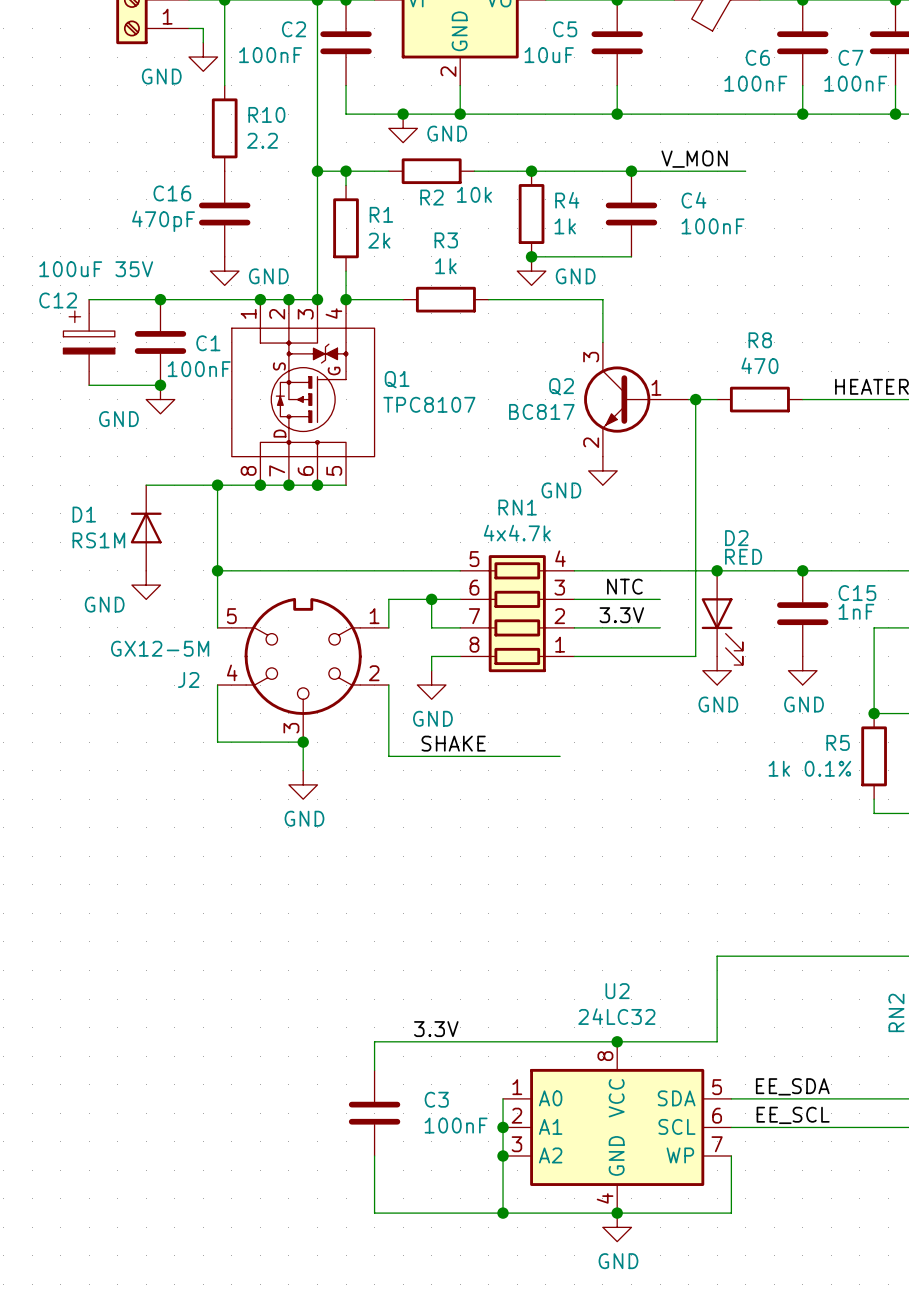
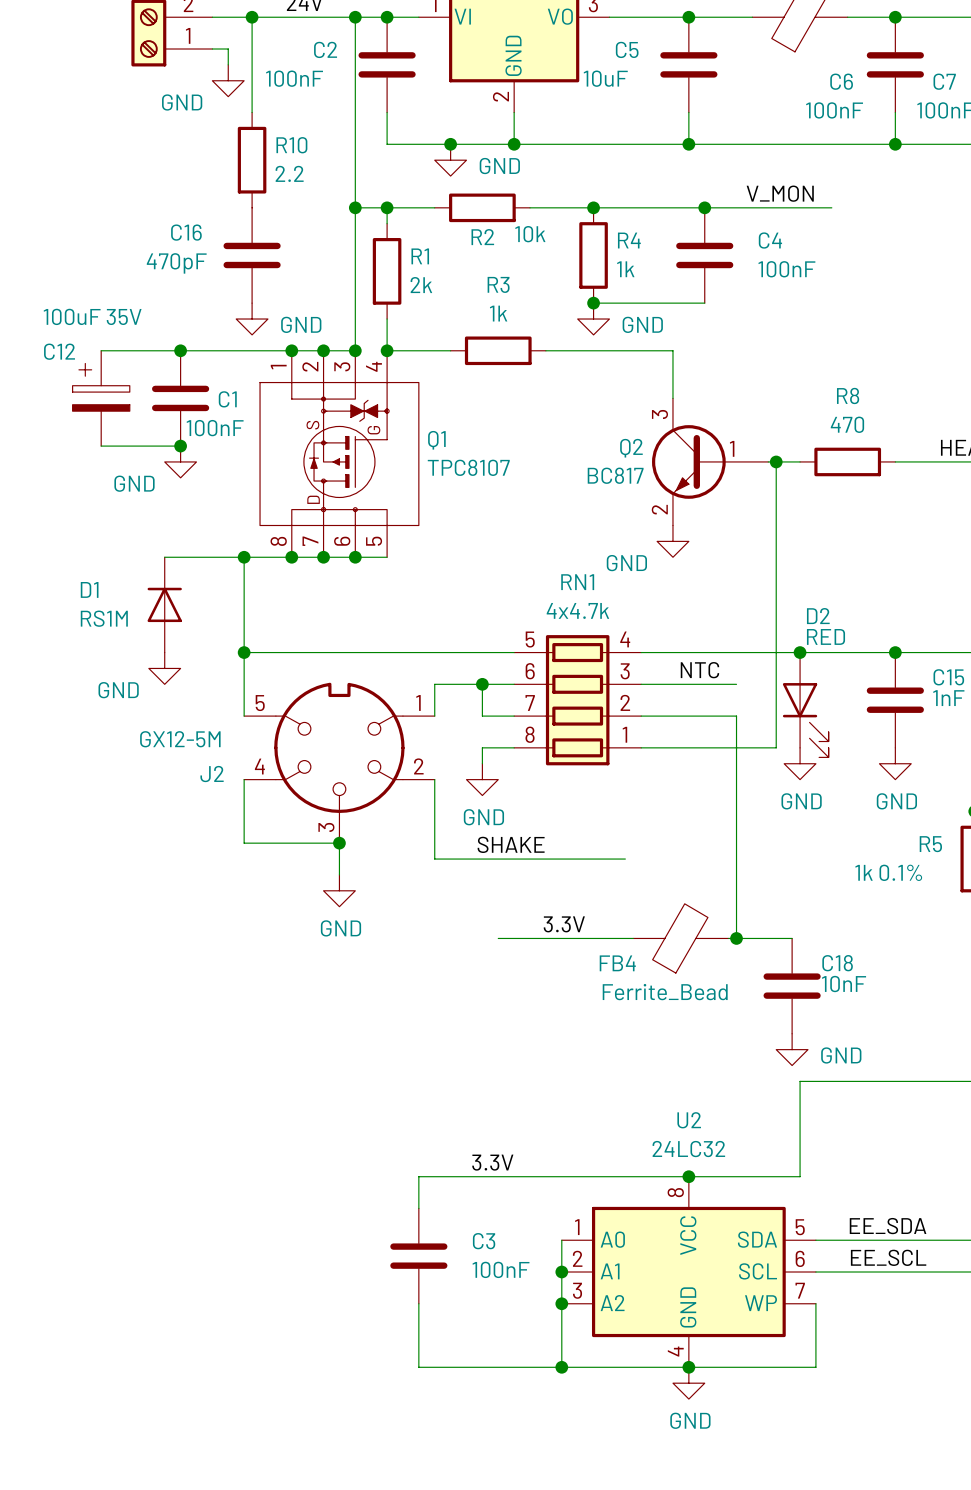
label position: 3.3V (621, 615) -> 3.3V (564, 924)
wire: none -> (736, 716) (736, 938)
wire: none -> (498, 938) (633, 938)
FB4: none -> Ferrite_Bead (680, 938)
wire: none -> (728, 938) (792, 938)
junction: none -> (736, 938)
C18: none -> 10nF (792, 986)
power symbol: none -> GND (792, 1049)

